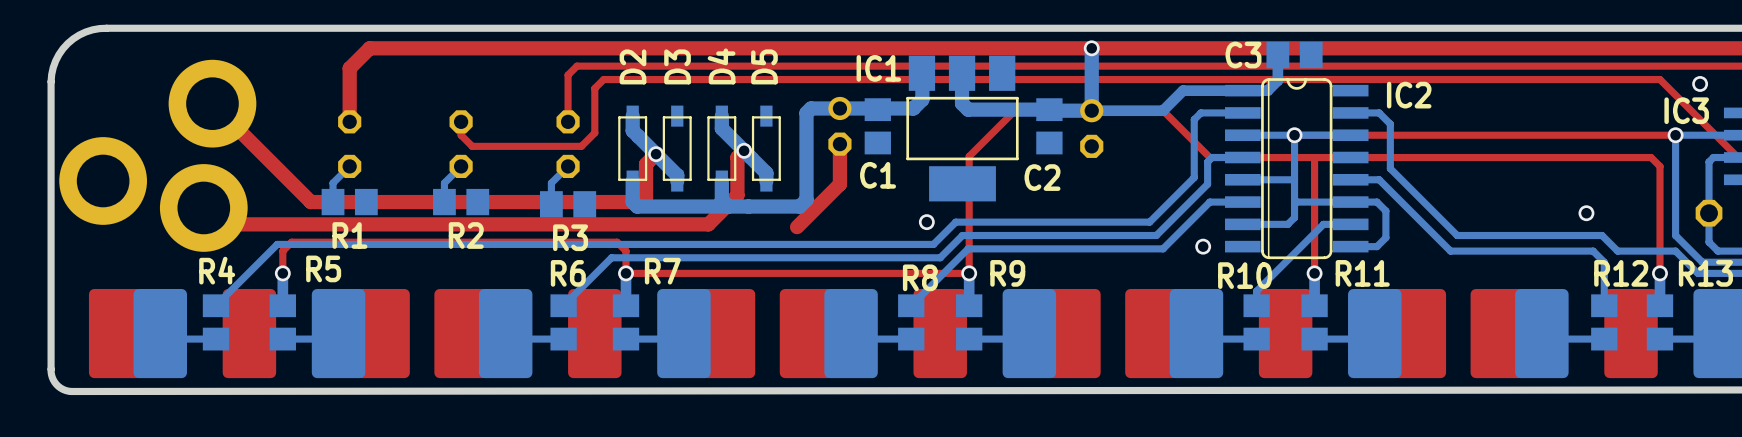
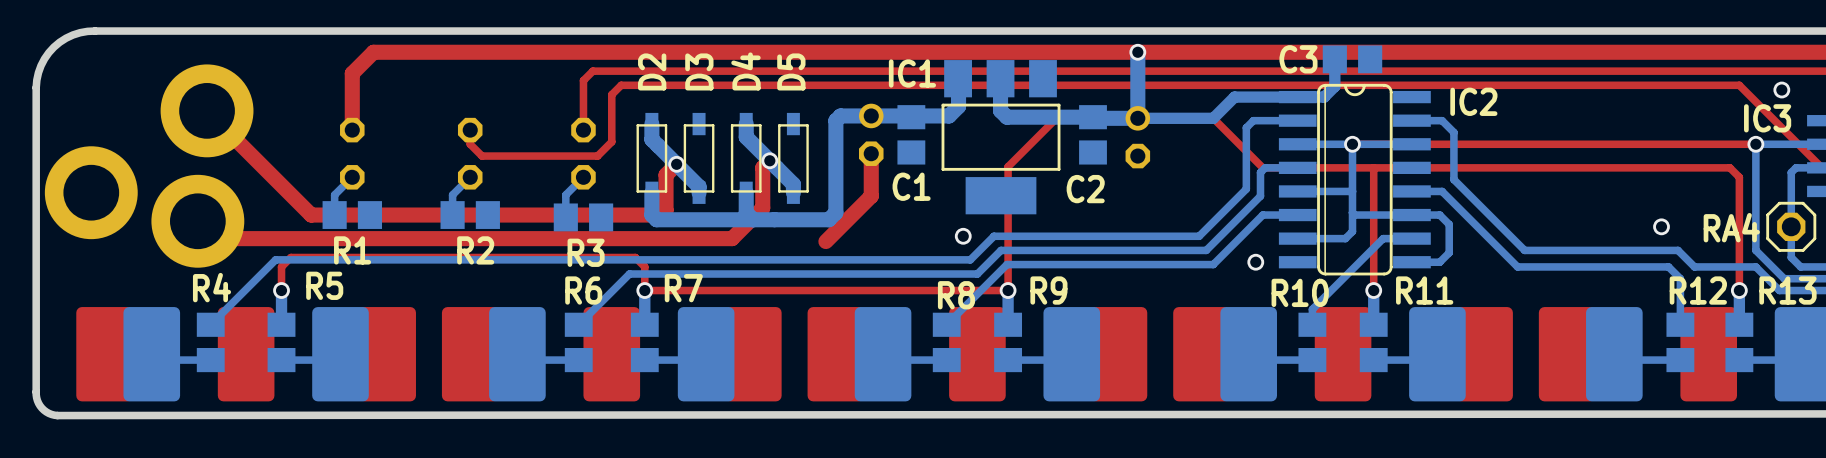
RA4 side: top (1709, 213) -> bottom (1791, 226)

